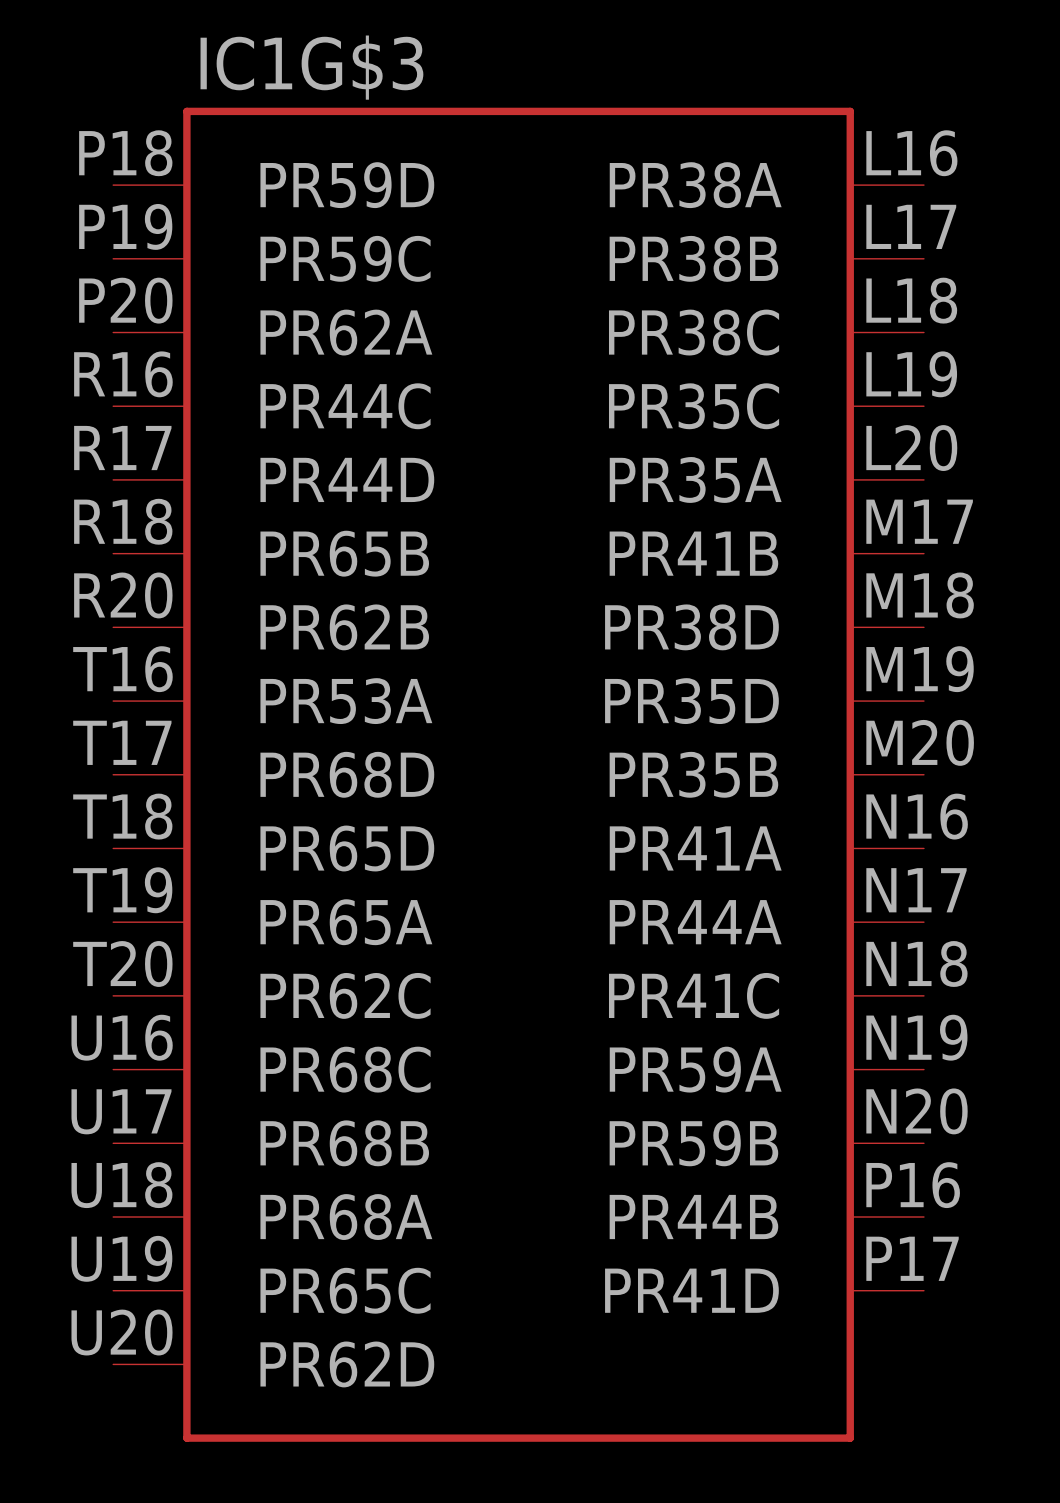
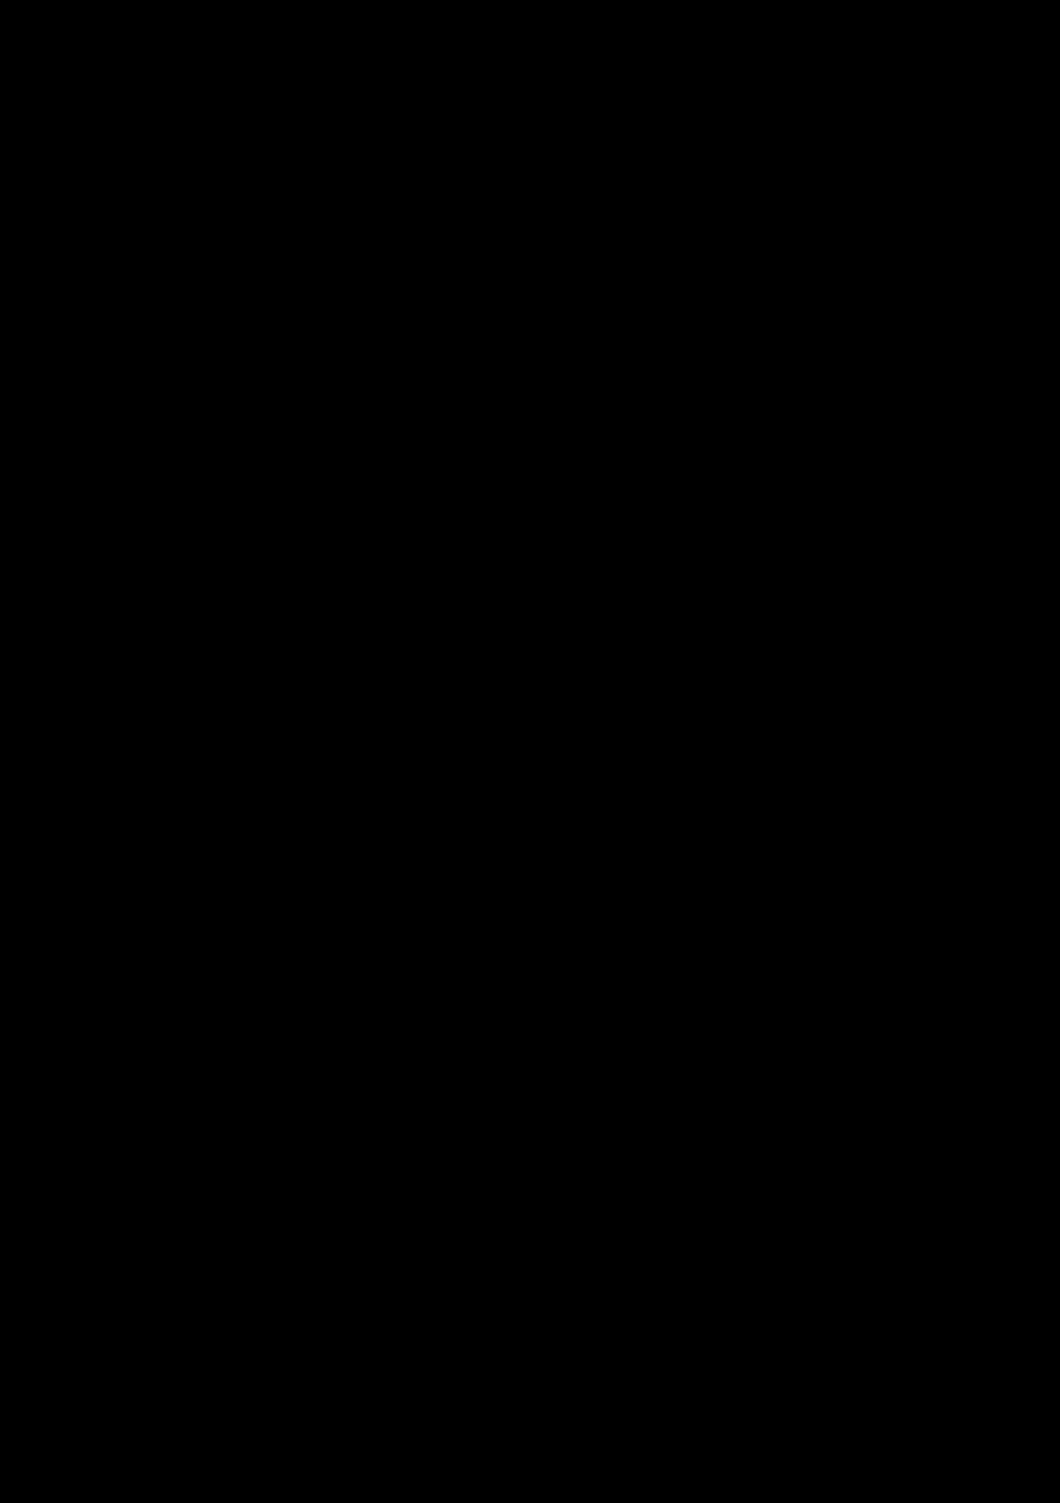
IC1G$3: (518, 774) -> none

